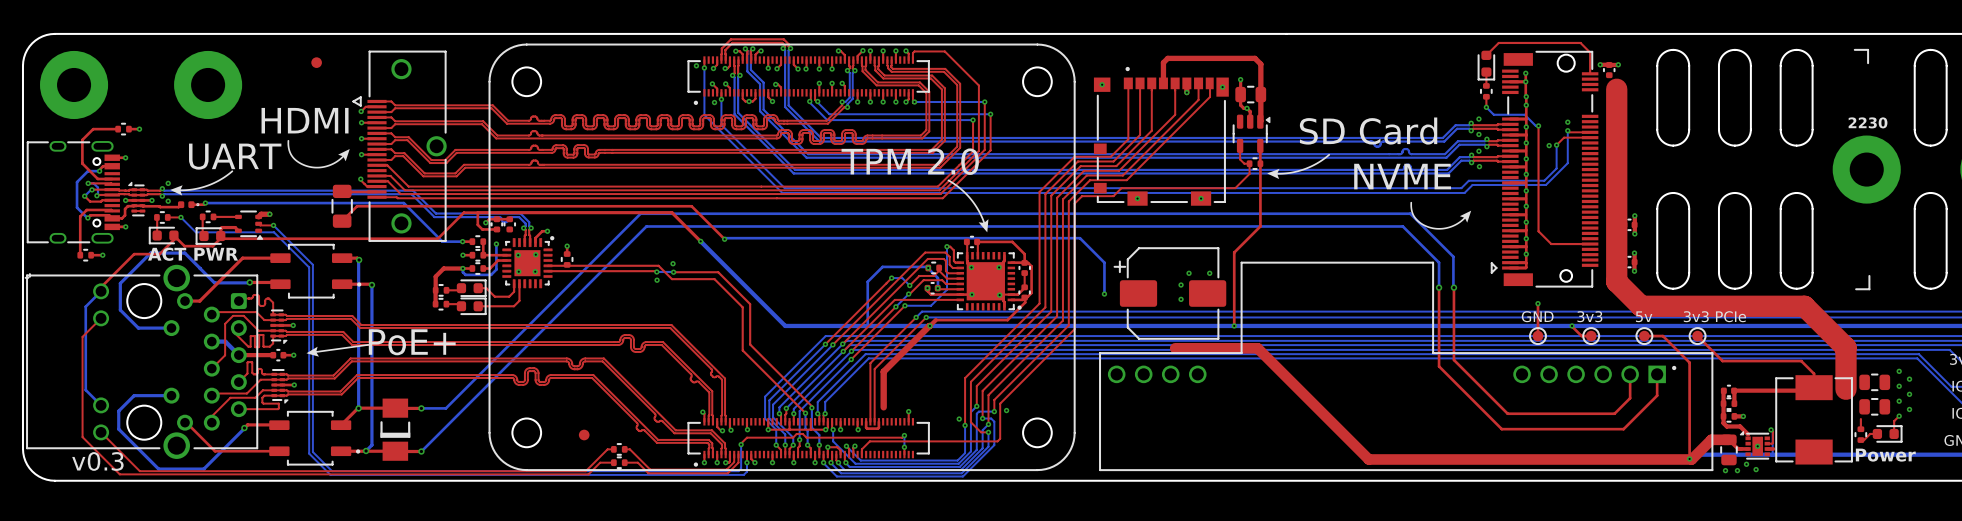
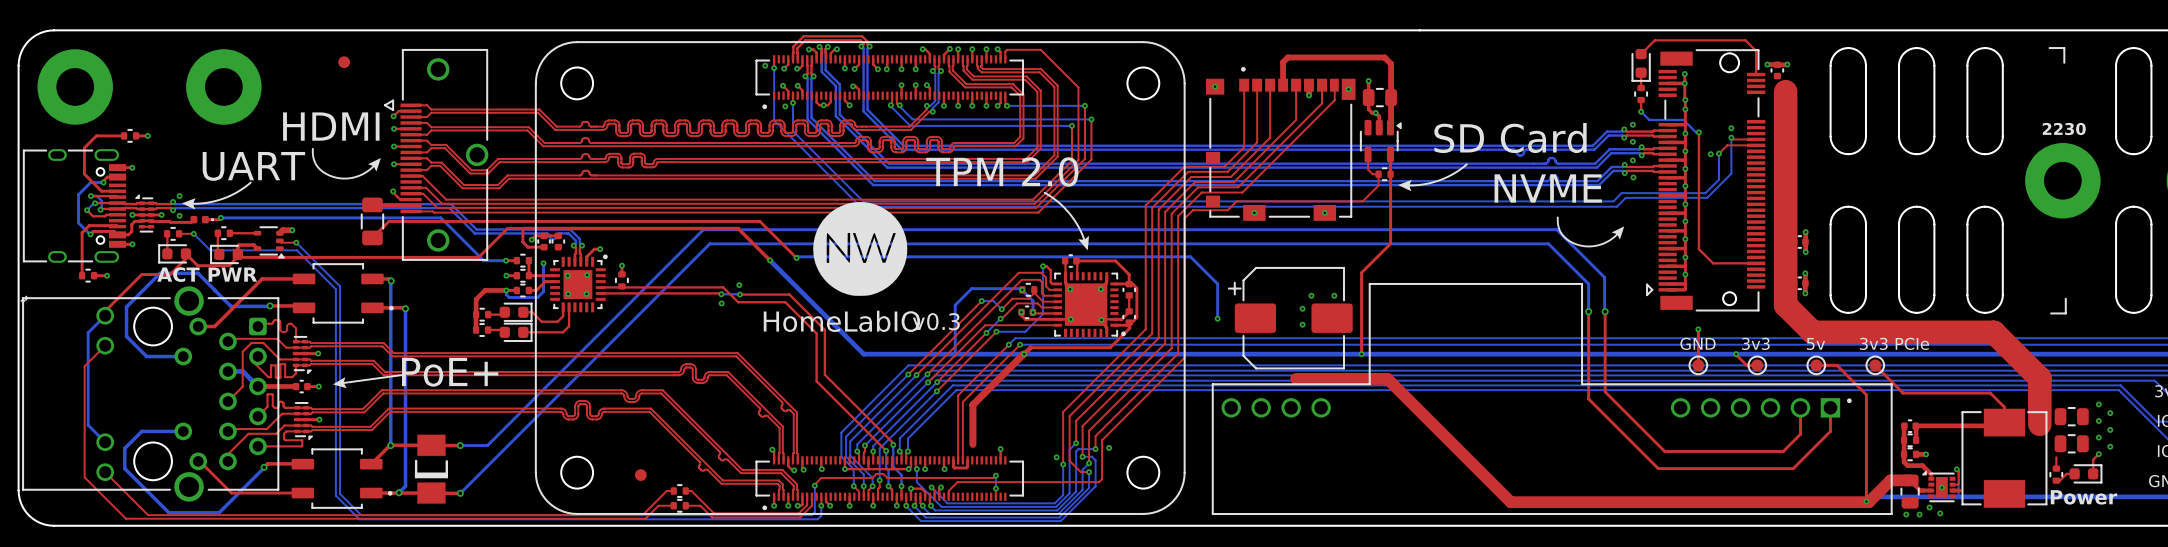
drawing: none -> [813, 202, 908, 296]
text: none -> HomeLabIO (841, 321)
text: none -> v0.3 (936, 321)
text: v0.3 (97, 461) -> none

